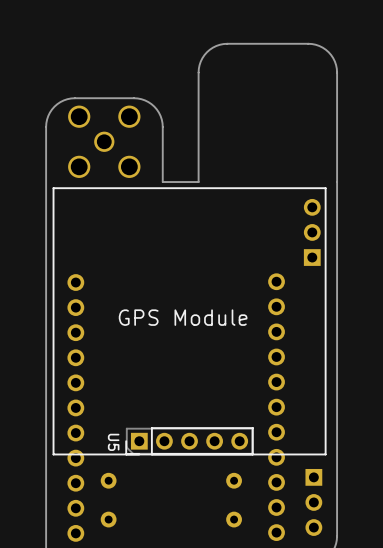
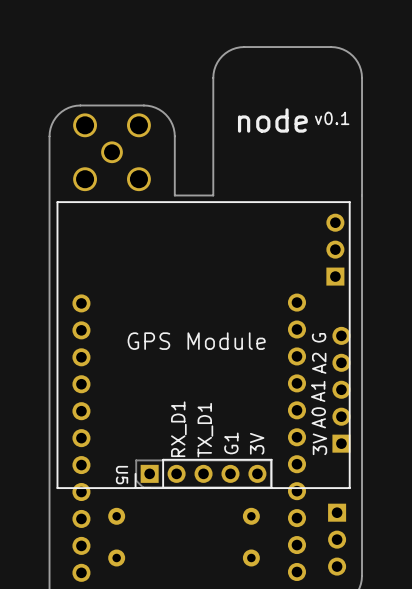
text: none -> v0.1 (332, 118)
text: none -> node (272, 120)
text: none -> G (319, 337)
text: none -> A2 (319, 363)
part: none -> (341, 389)
text: none -> A1 (318, 391)
text: none -> A0 (318, 417)
text: none -> RX_D1 (178, 429)
text: none -> TX_D1 (205, 430)
text: none -> G1 (231, 443)
text: none -> 3V (257, 443)
text: none -> 3V (319, 444)

